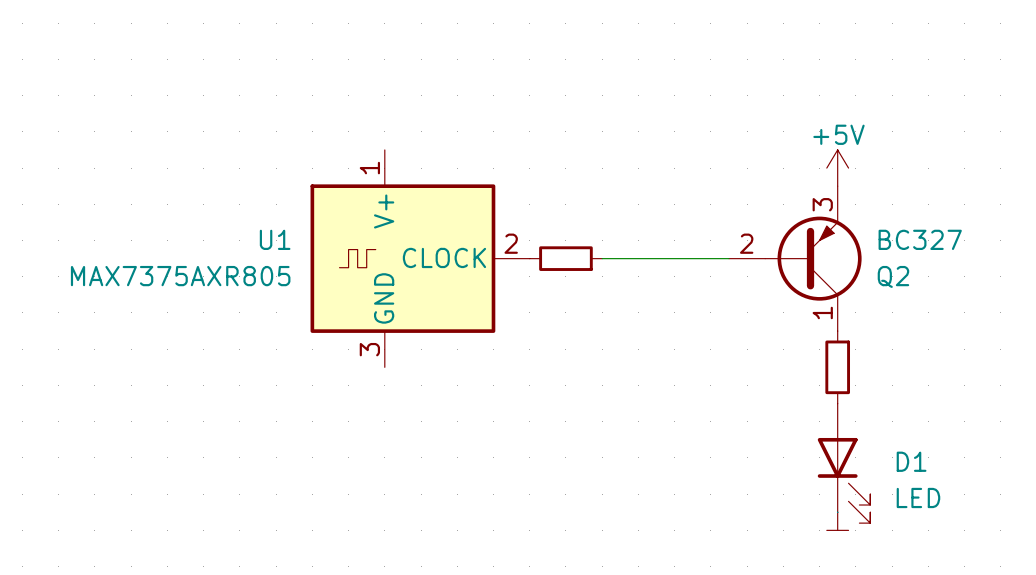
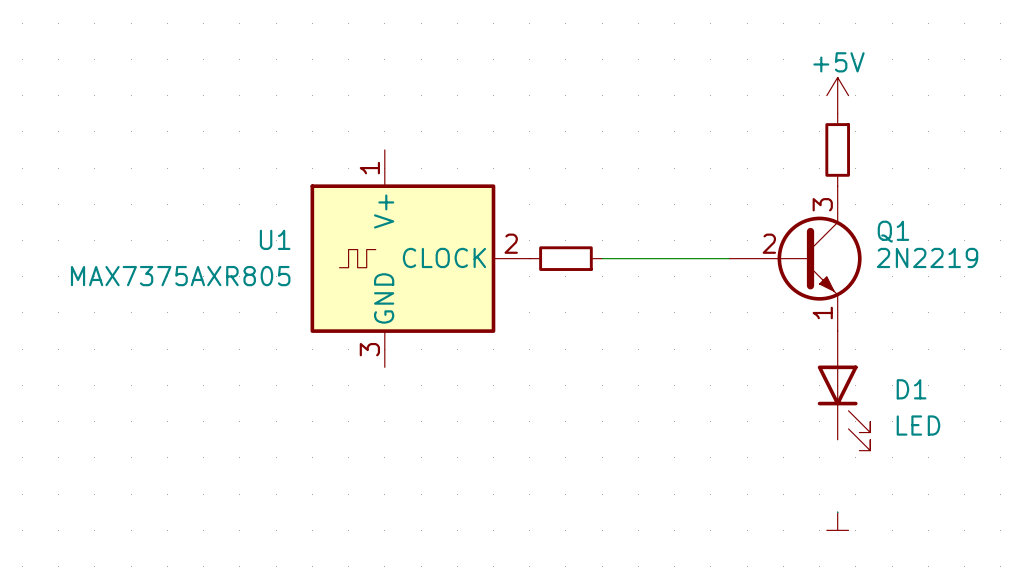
power symbol position: +5V (837, 168) -> +5V (837, 95)
Q2: BC327 (795, 258) -> none
Q1: none -> 2N2219 (795, 258)
part position: (837, 367) -> (837, 149)
D1 position: (844, 463) -> (844, 390)

